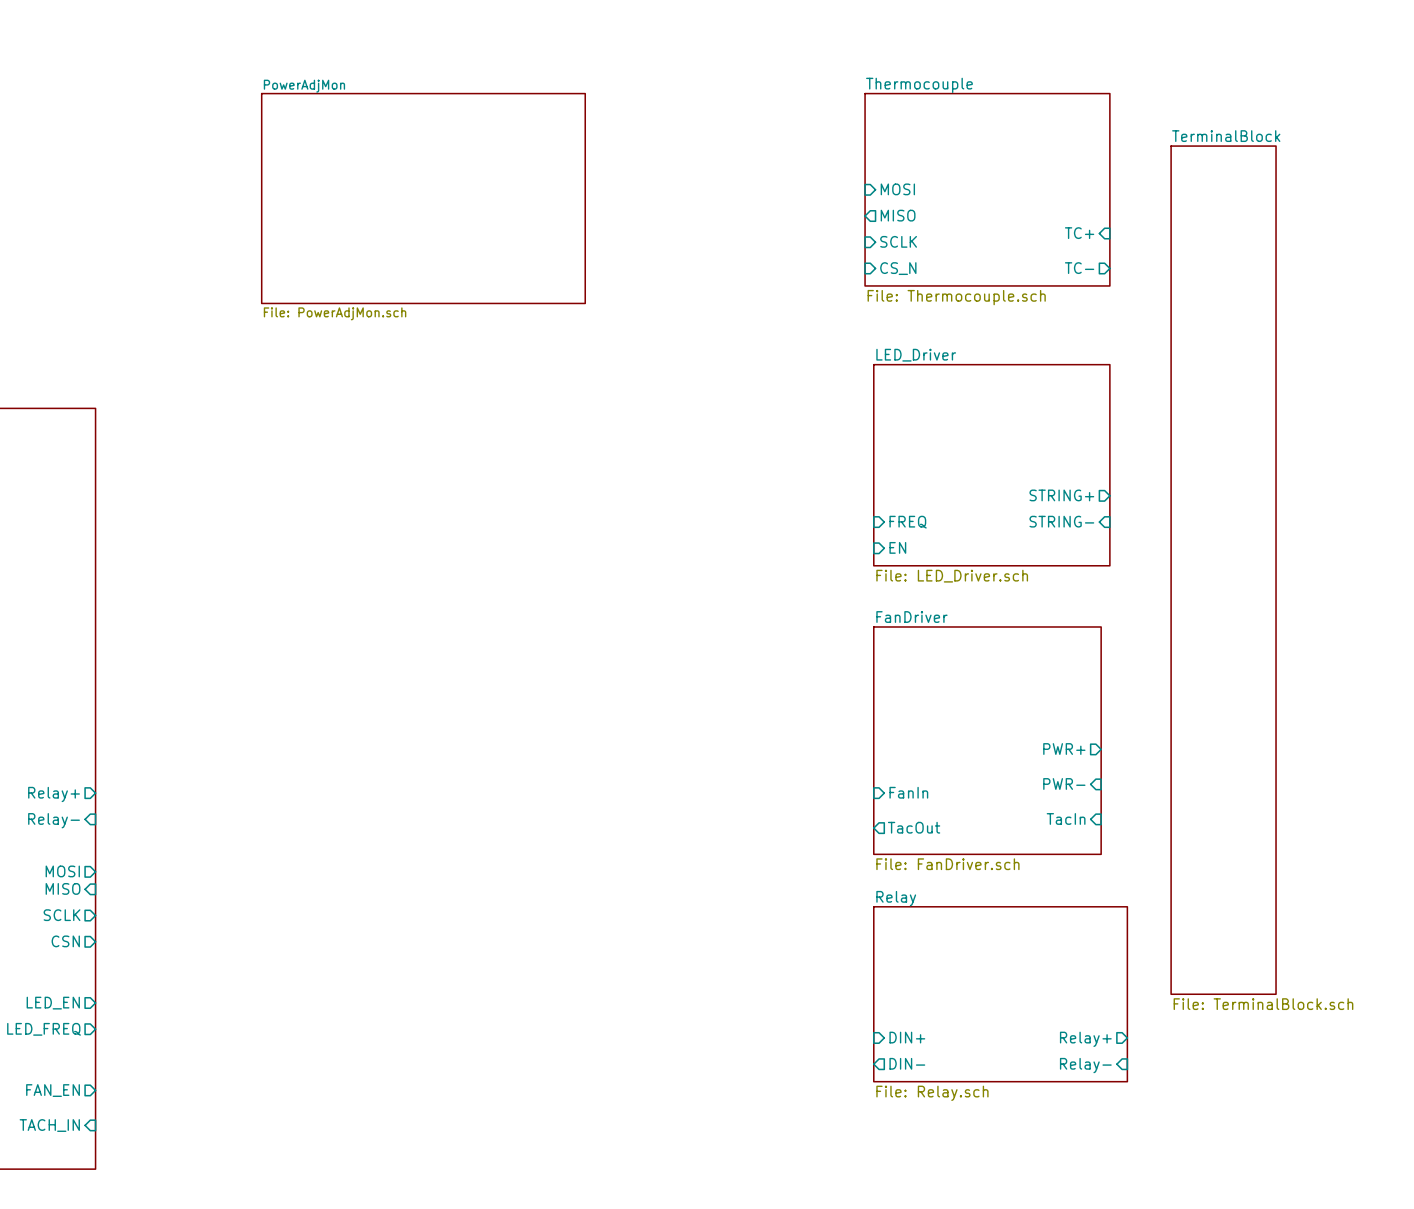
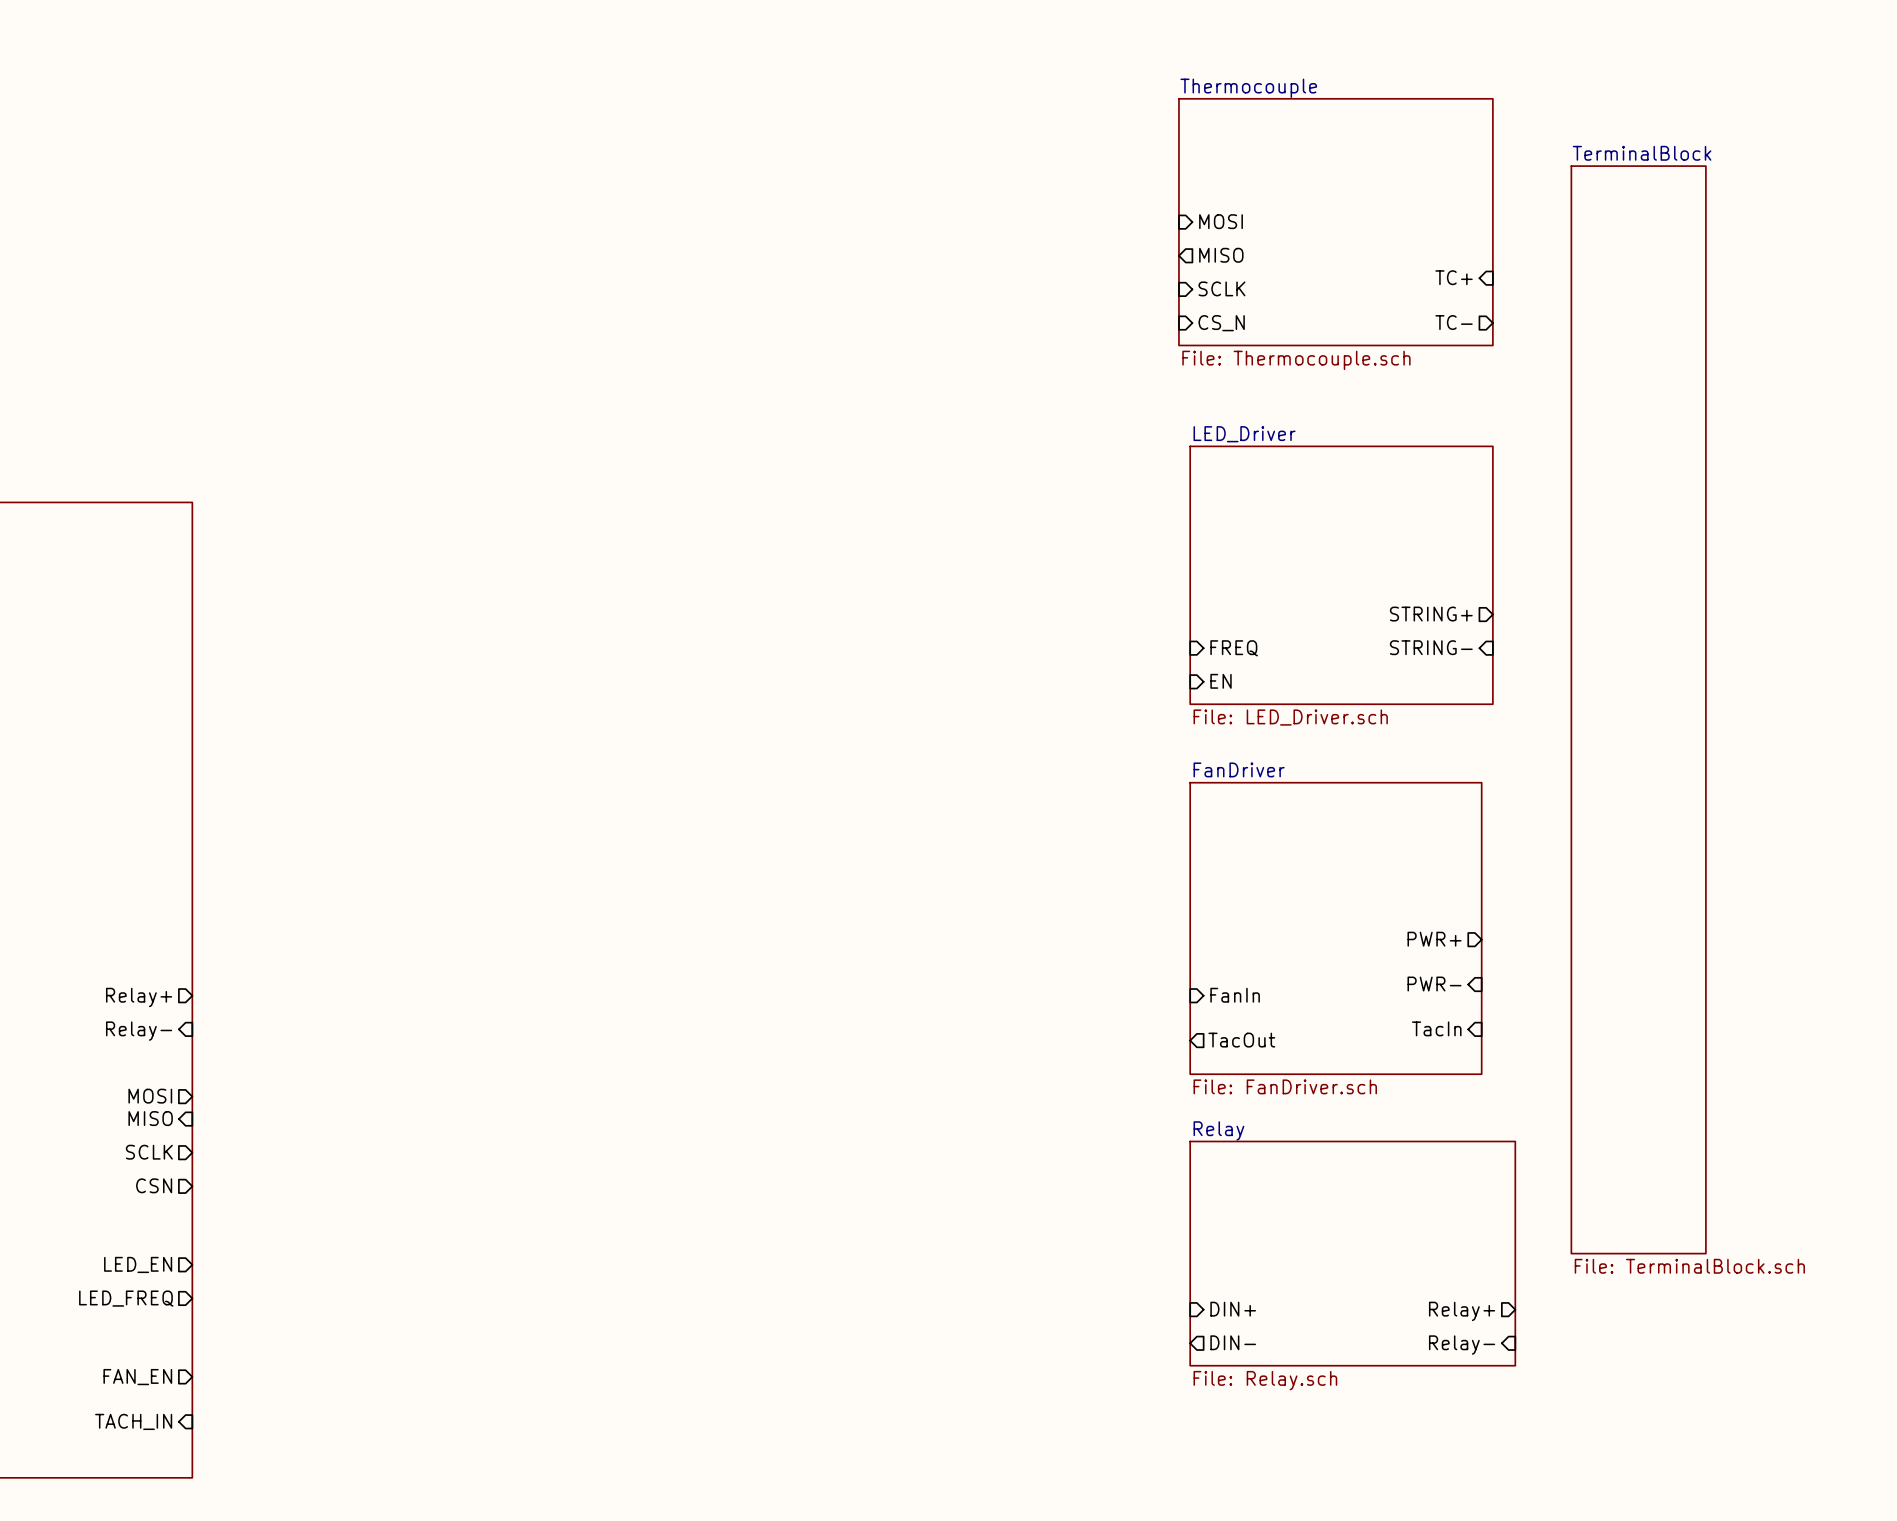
sheet PowerAdjMon: File: PowerAdjMon.sch (423, 198) -> none

